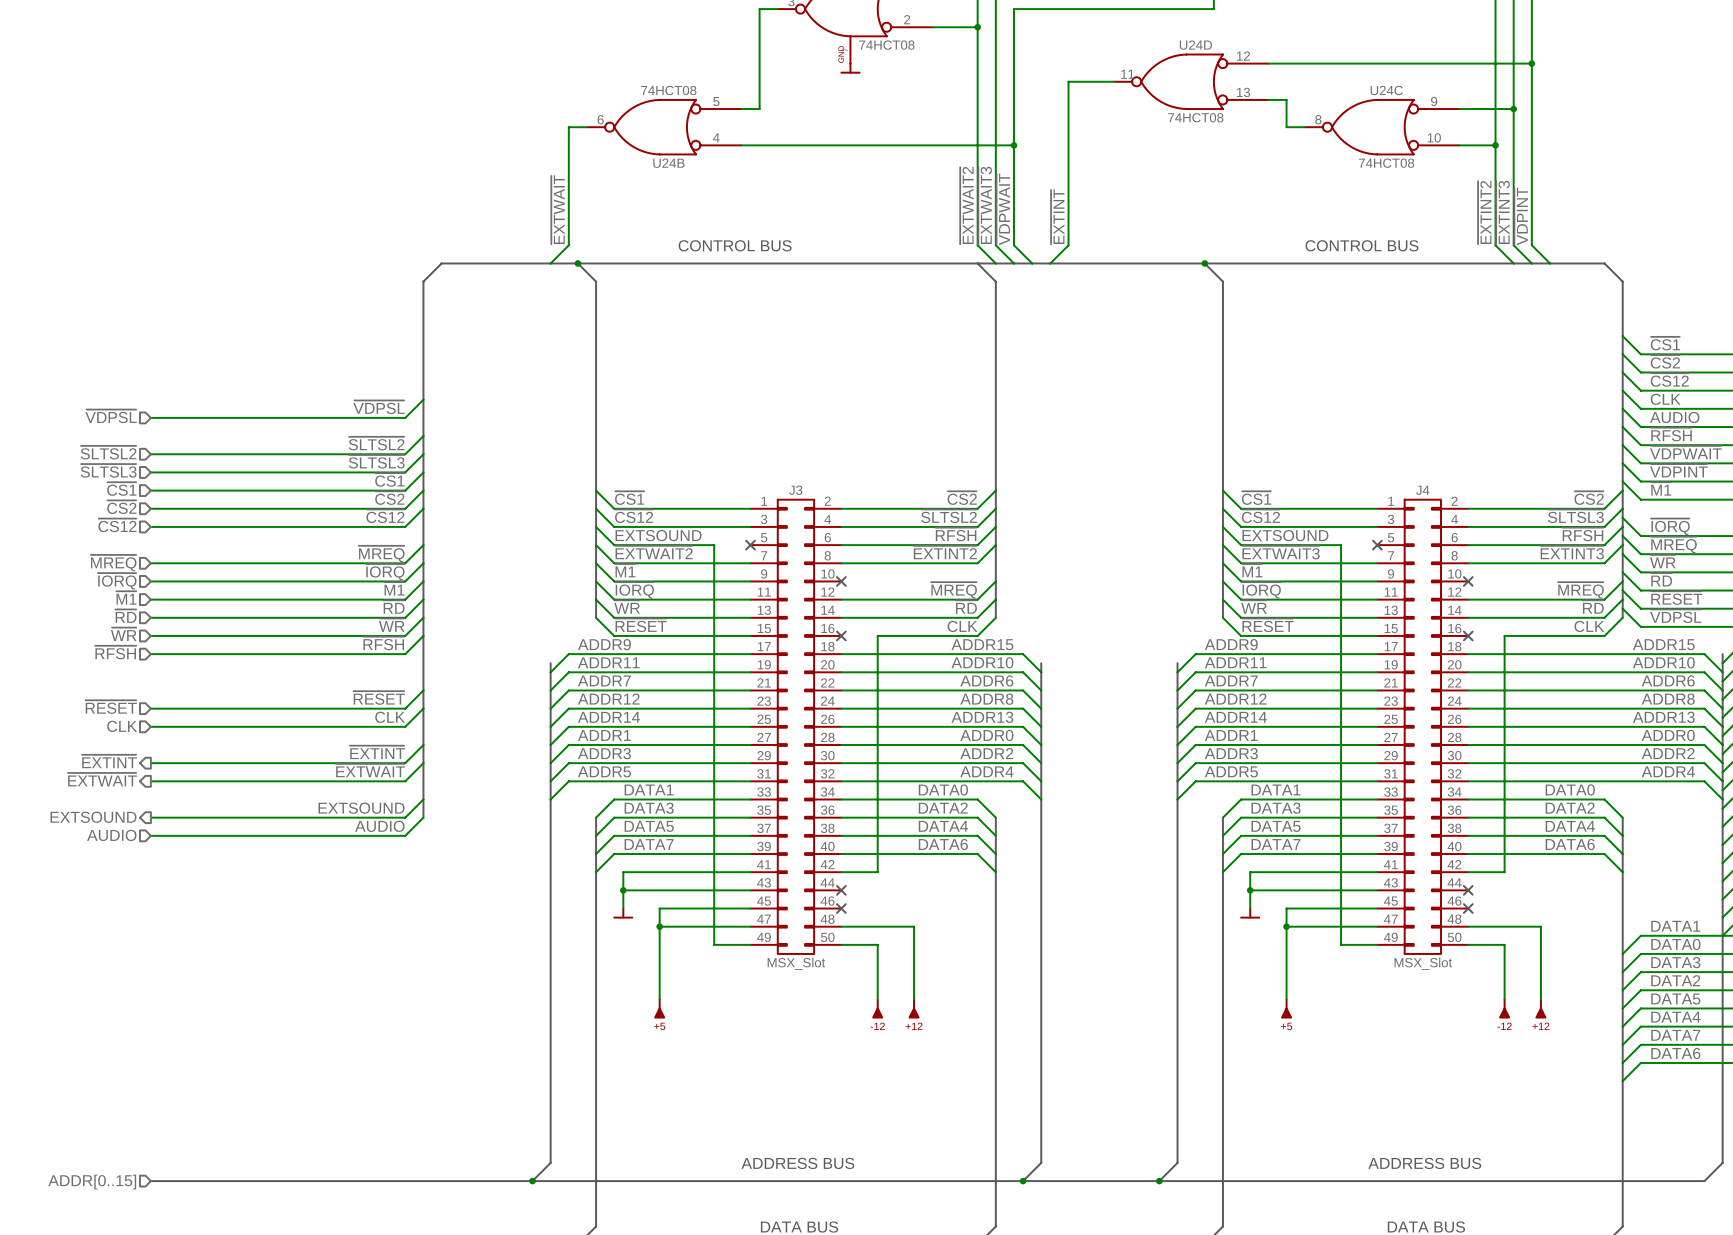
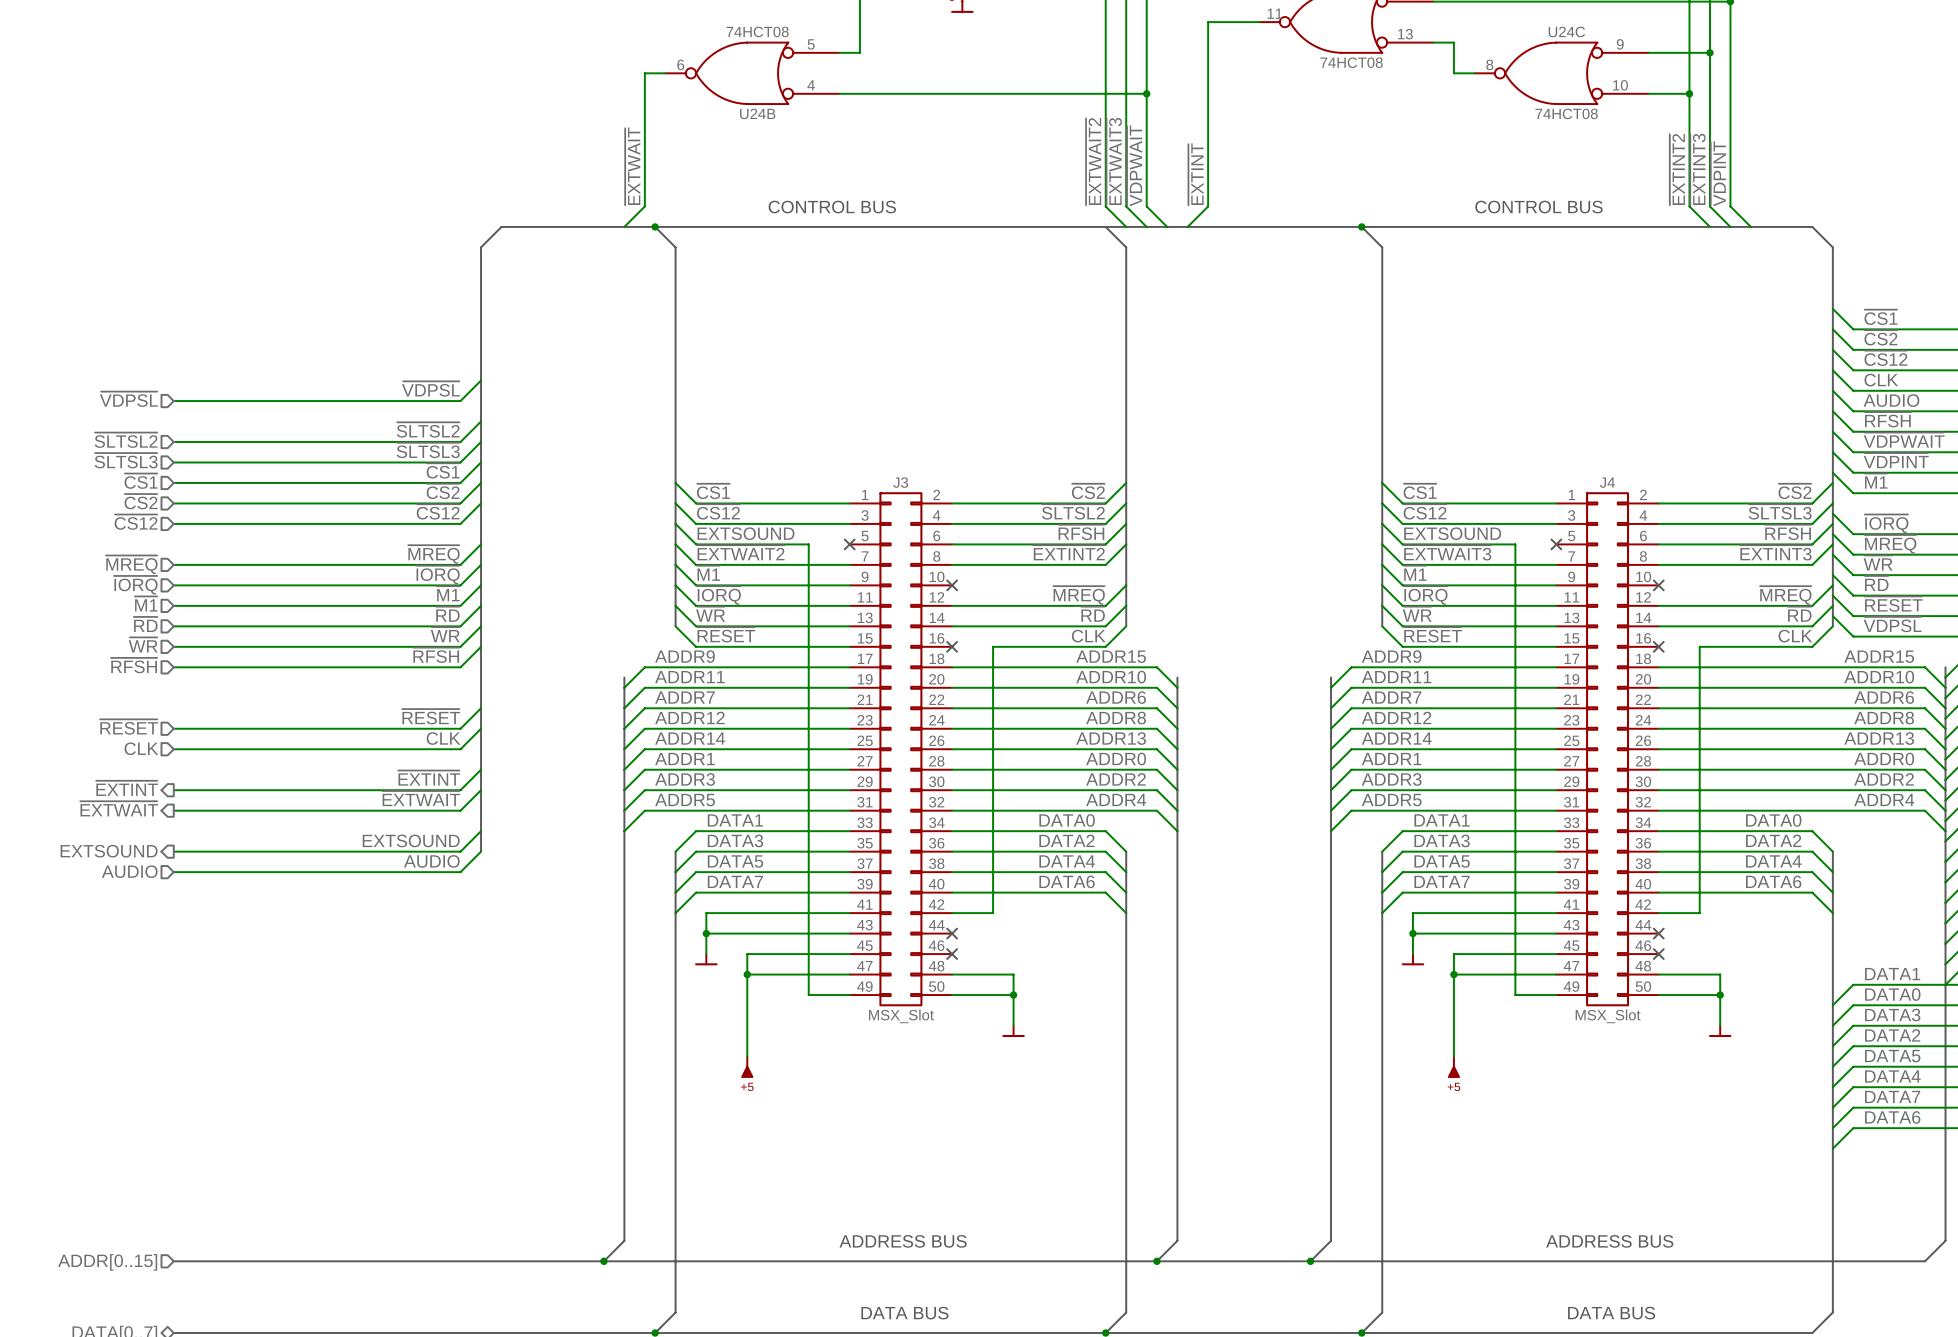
wire: (895, 926) (914, 926) (914, 999) -> (1013, 974) (1013, 1025)
wire: (1522, 926) (1540, 926) (1540, 999) -> (1720, 974) (1720, 1025)
wire: (877, 944) (877, 999) -> (993, 995) (1013, 995)
junction: none -> (1013, 995)
wire: (1504, 944) (1504, 999) -> (1699, 995) (1720, 995)
junction: none -> (1720, 995)
power symbol: none -> (1013, 1031)
power symbol: none -> (1720, 1031)
power symbol: (877, 1008) -> none
power symbol: (914, 1008) -> none
power symbol: (1504, 1008) -> none
power symbol: (1540, 1008) -> none

